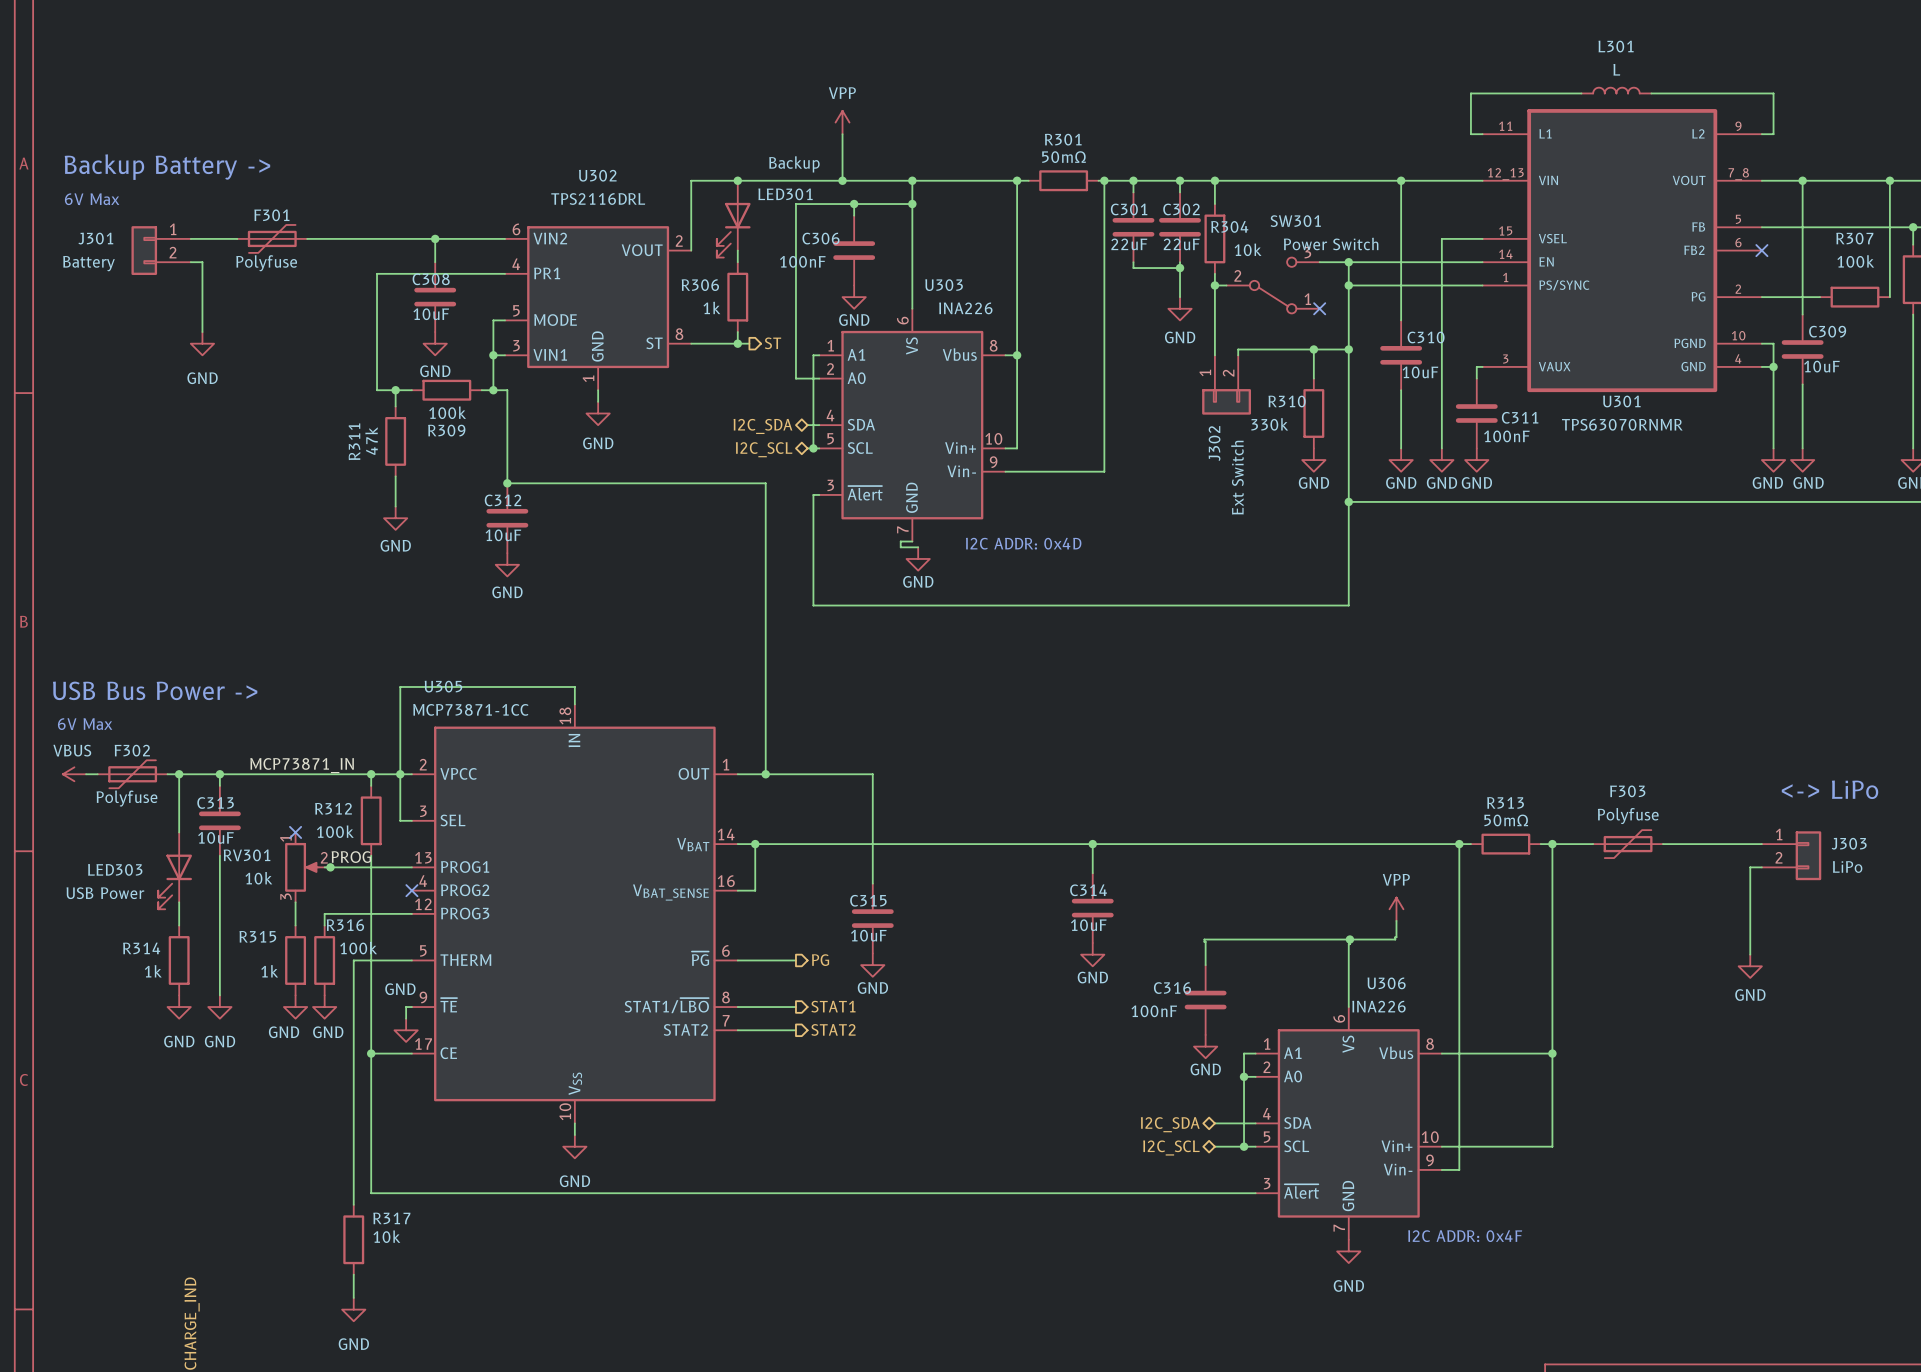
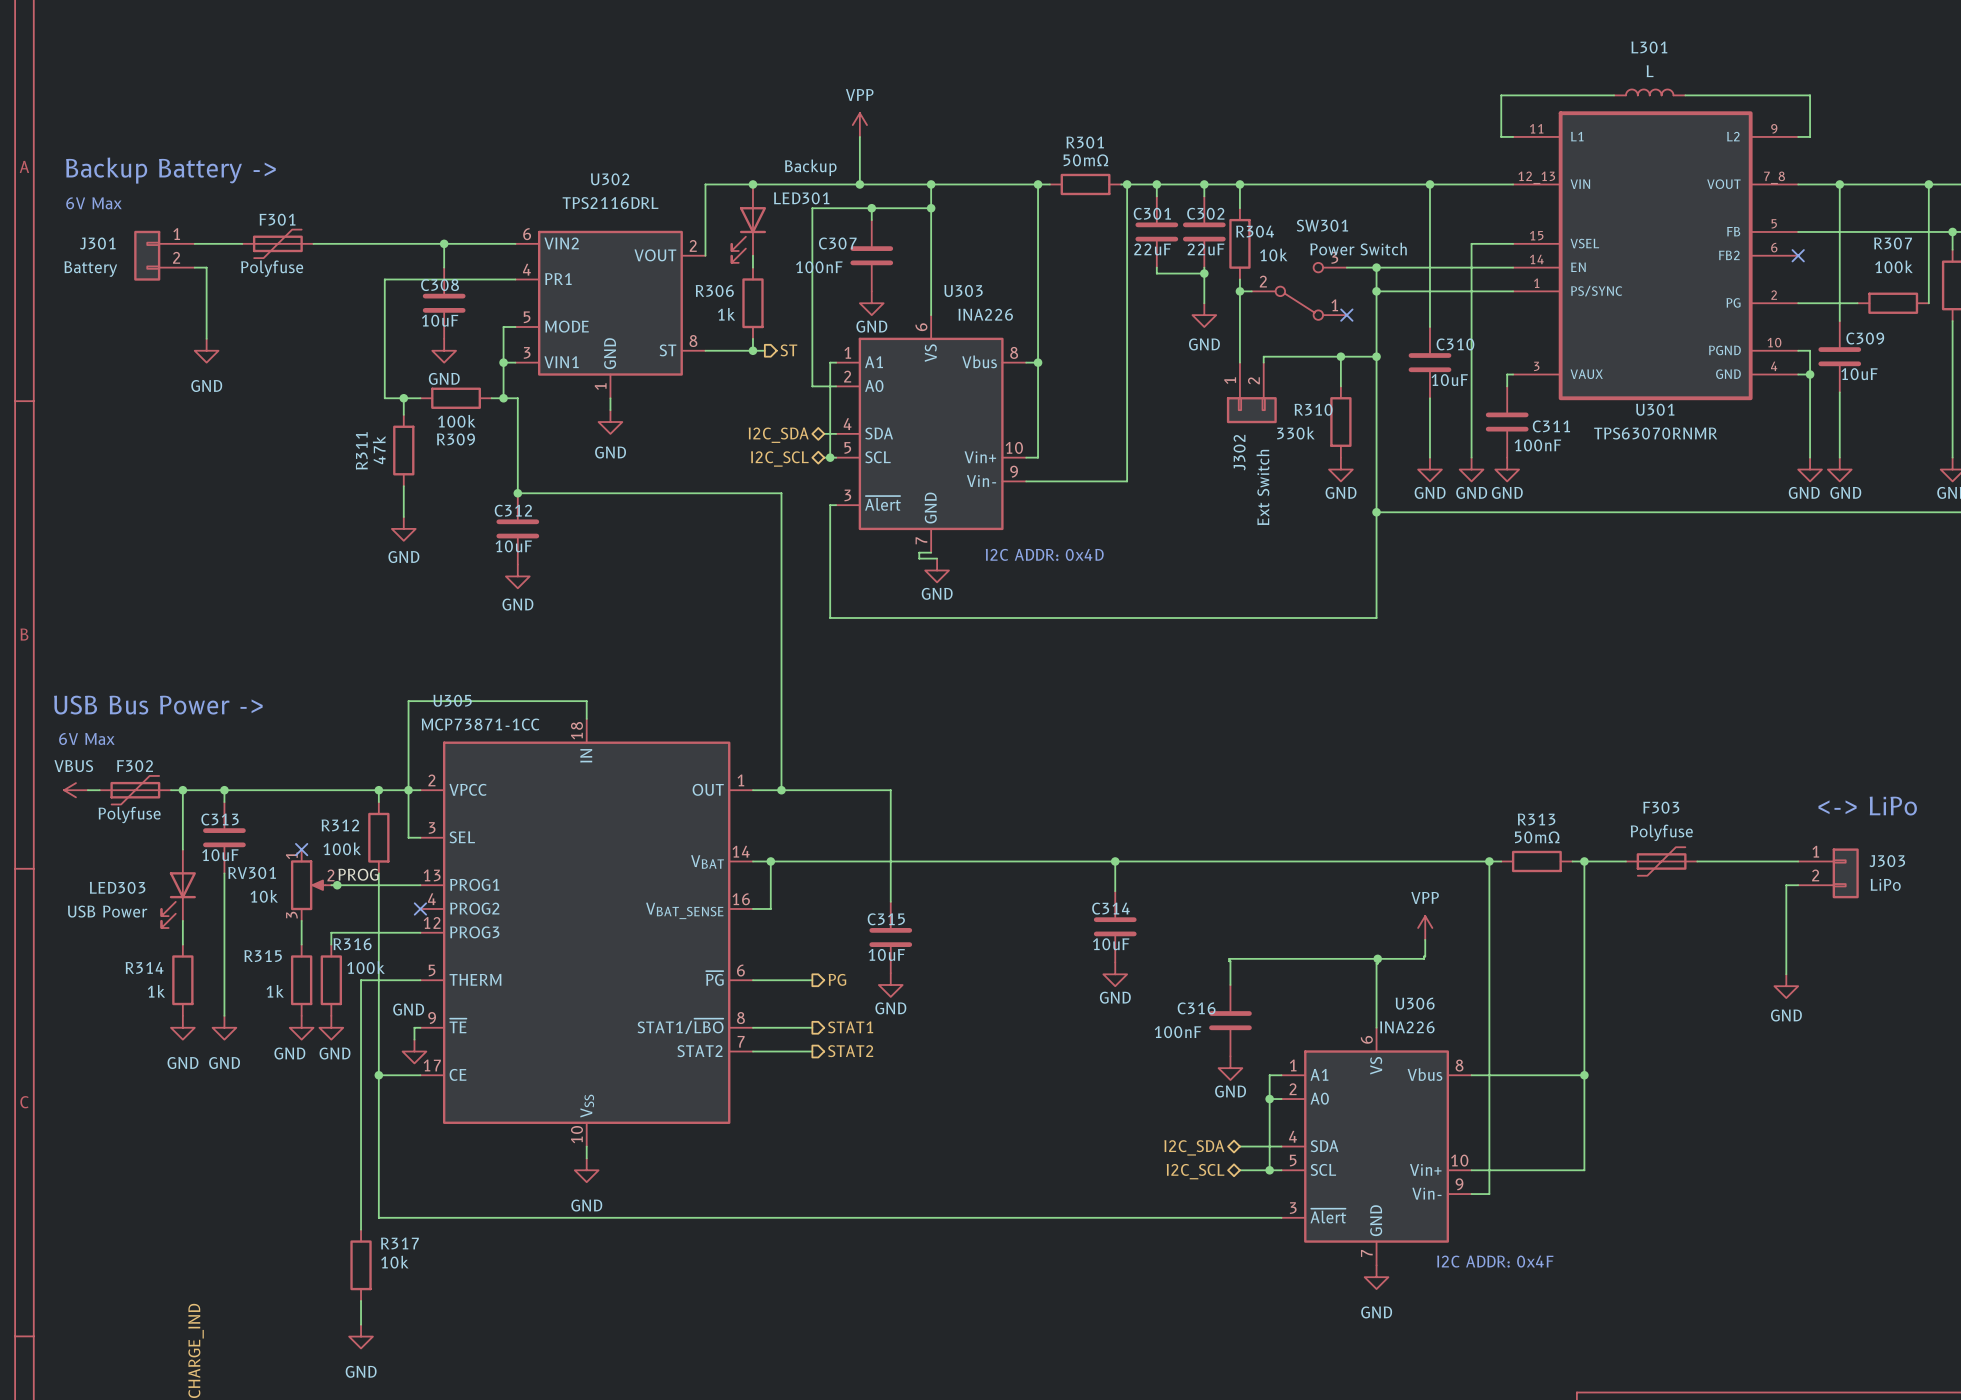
C306 name: C306 (820, 238) -> C307 (837, 243)
label: MCP73871_IN (302, 765) -> none

